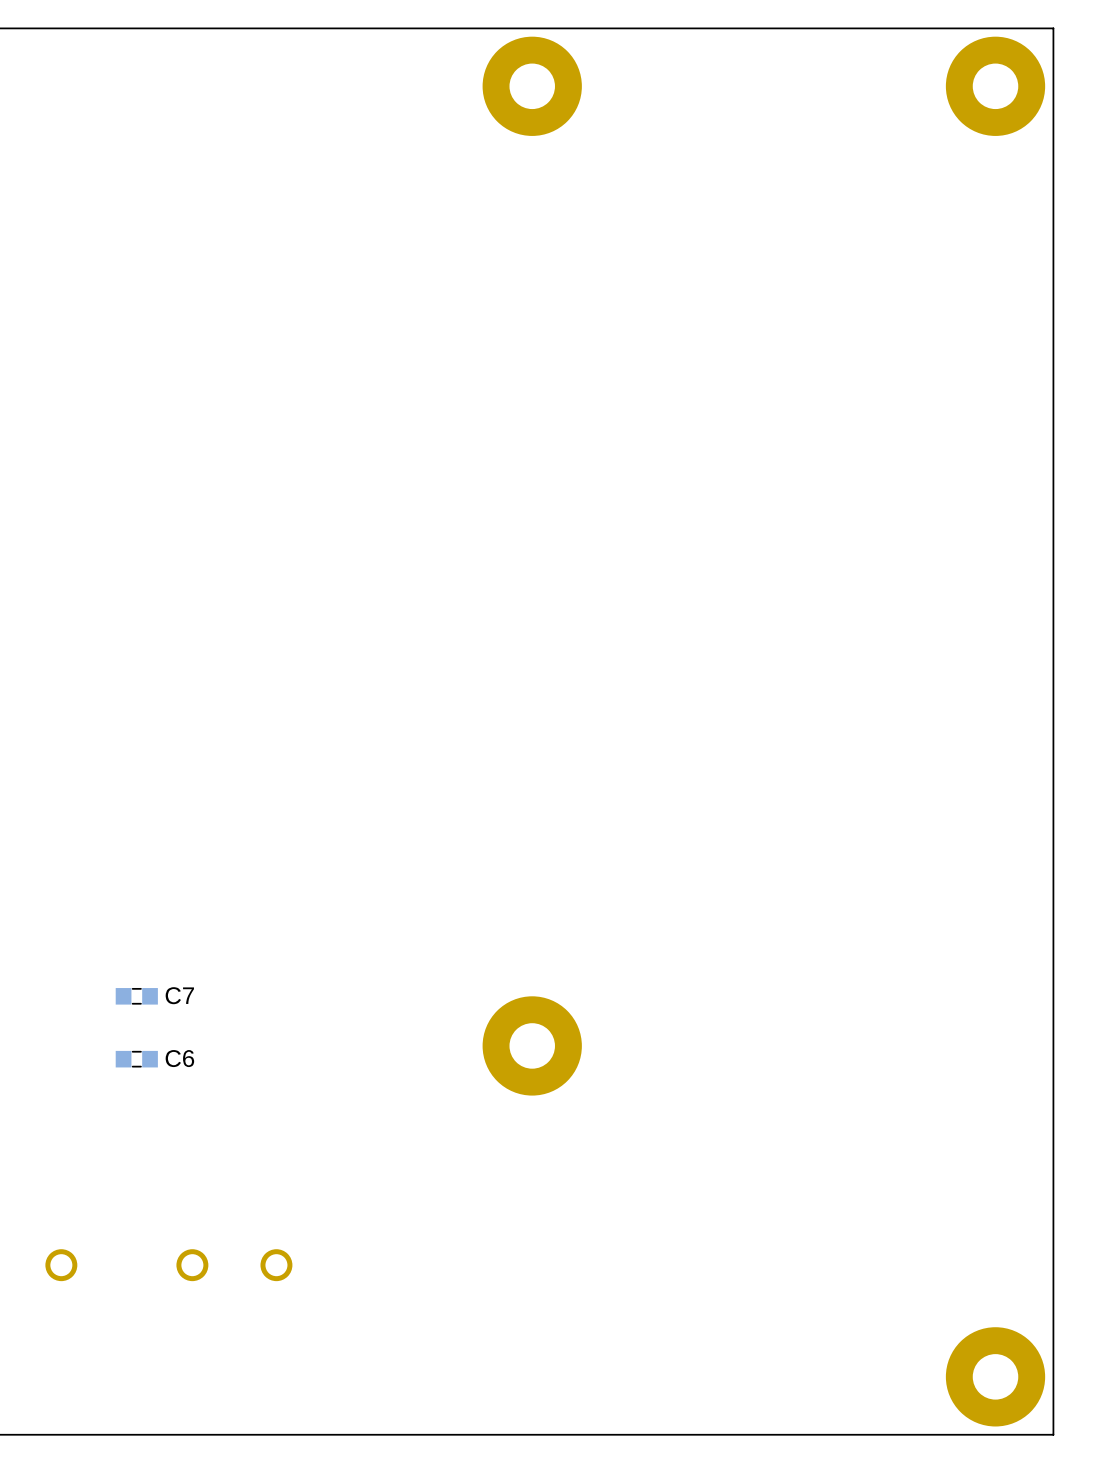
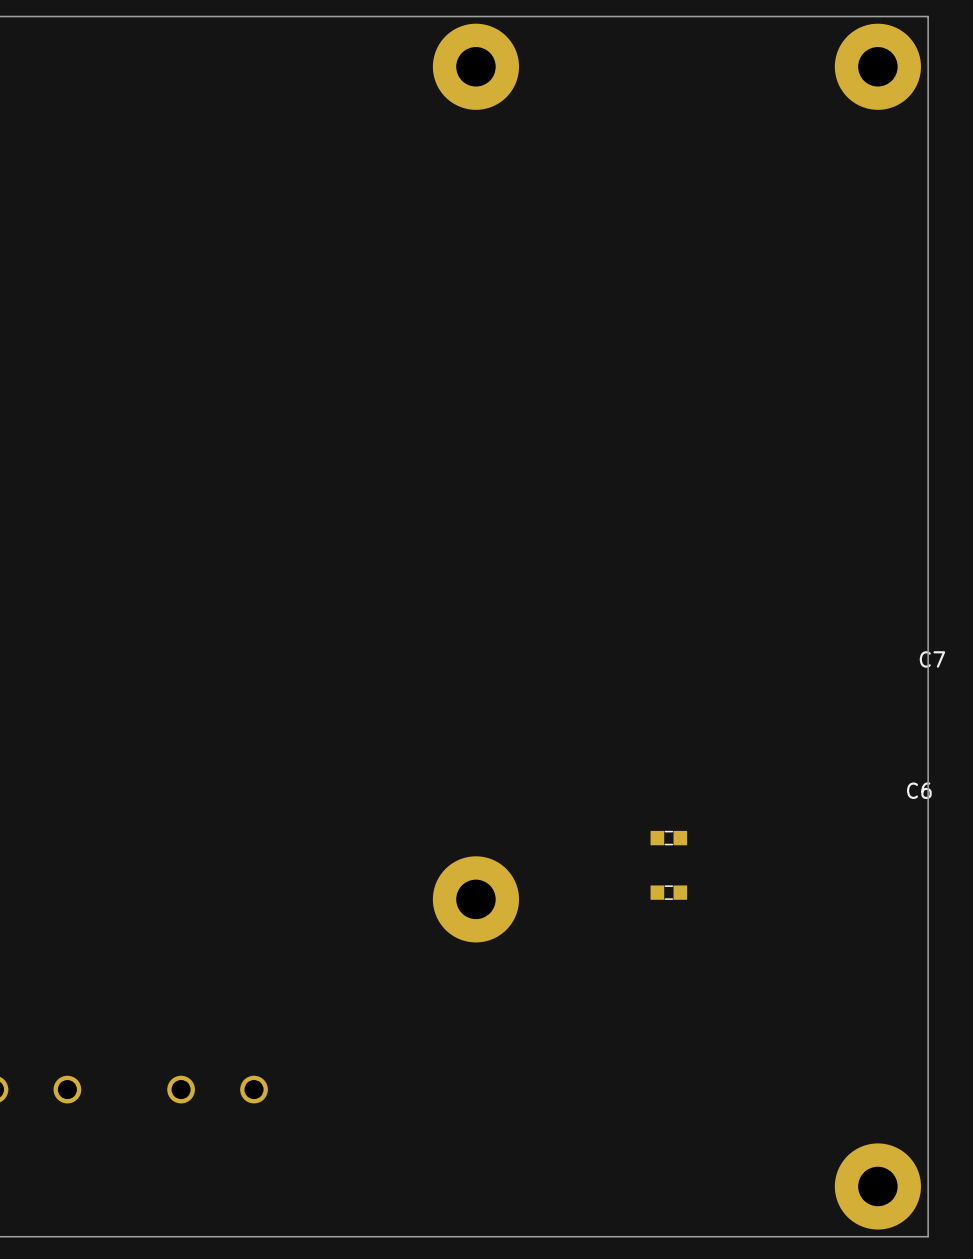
C7 name position: C7 (179, 995) -> C7 (932, 659)
C7 position: (136, 996) -> (668, 838)
C6 name position: C6 (179, 1058) -> C6 (919, 790)
C6 position: (136, 1059) -> (668, 892)

